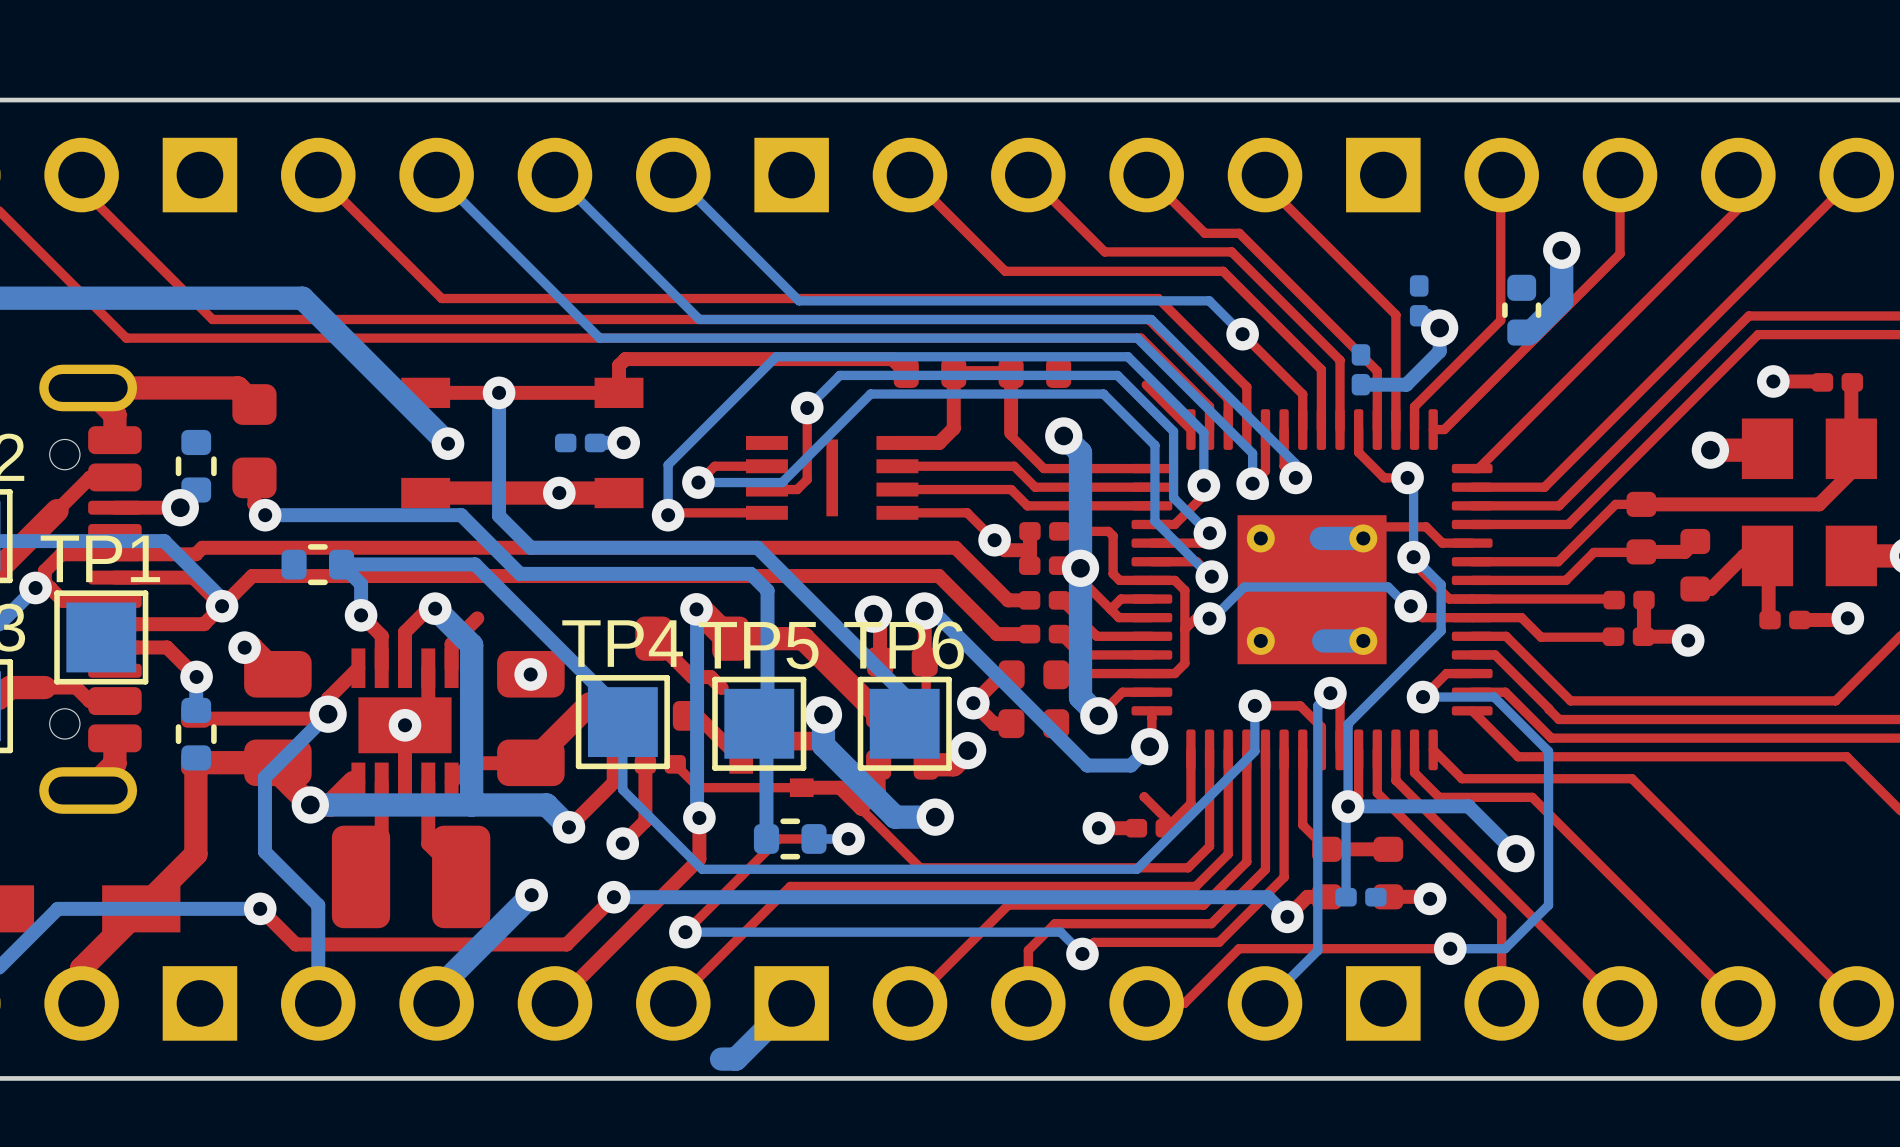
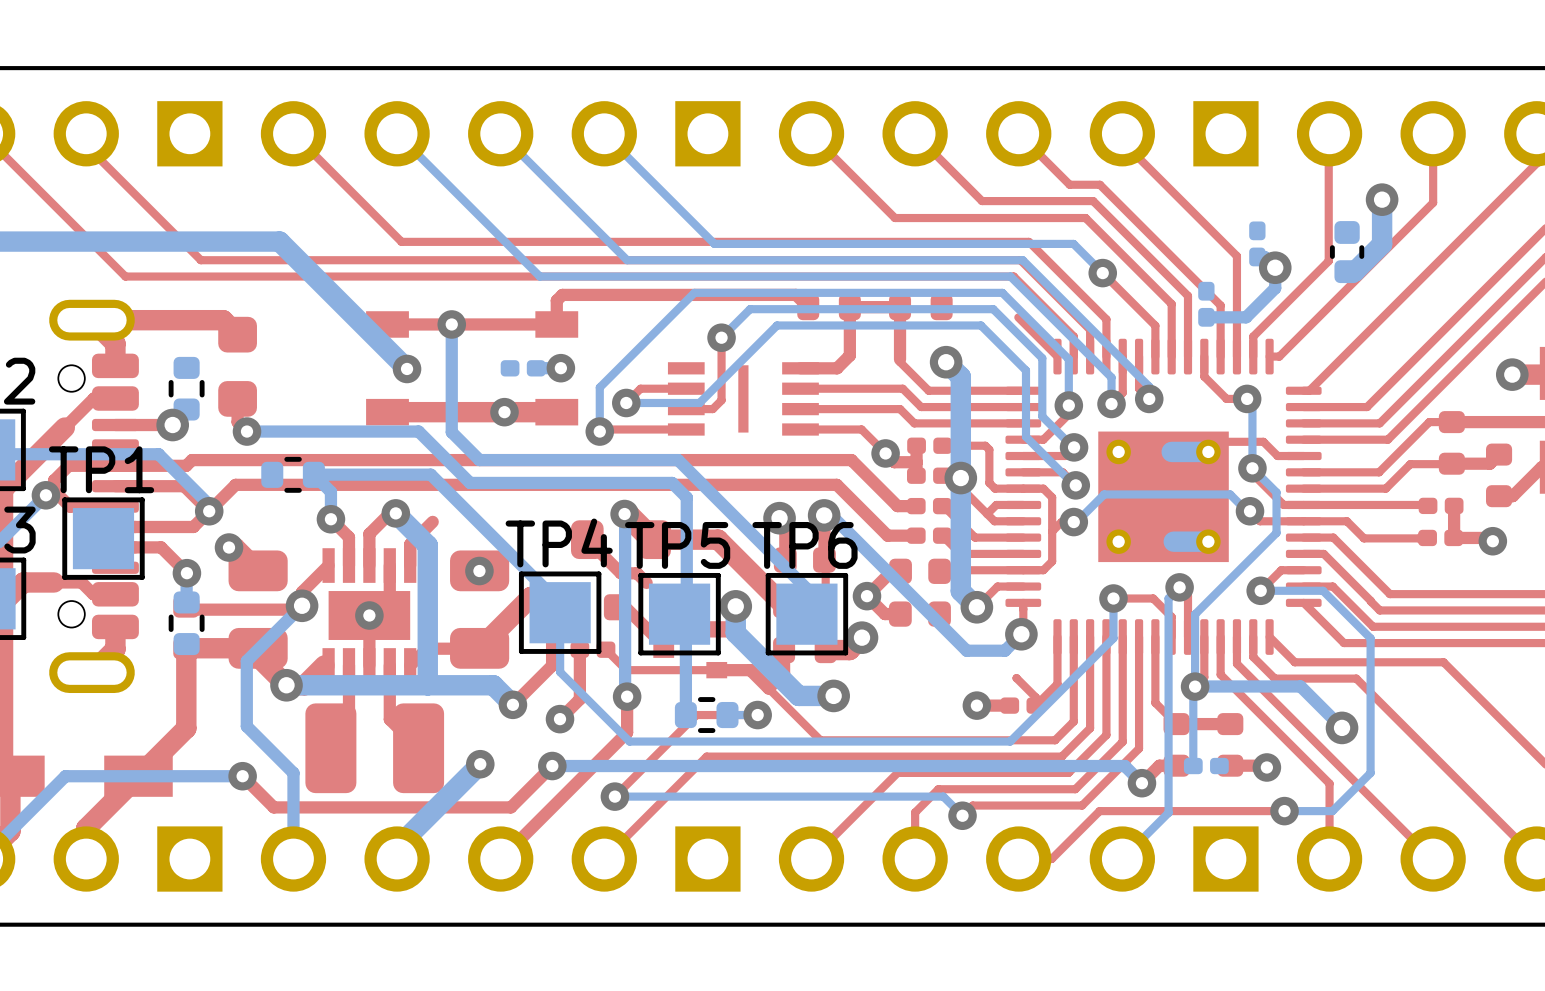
bottom track: (791, 1003) (735, 1059) (721, 1059) -> none

